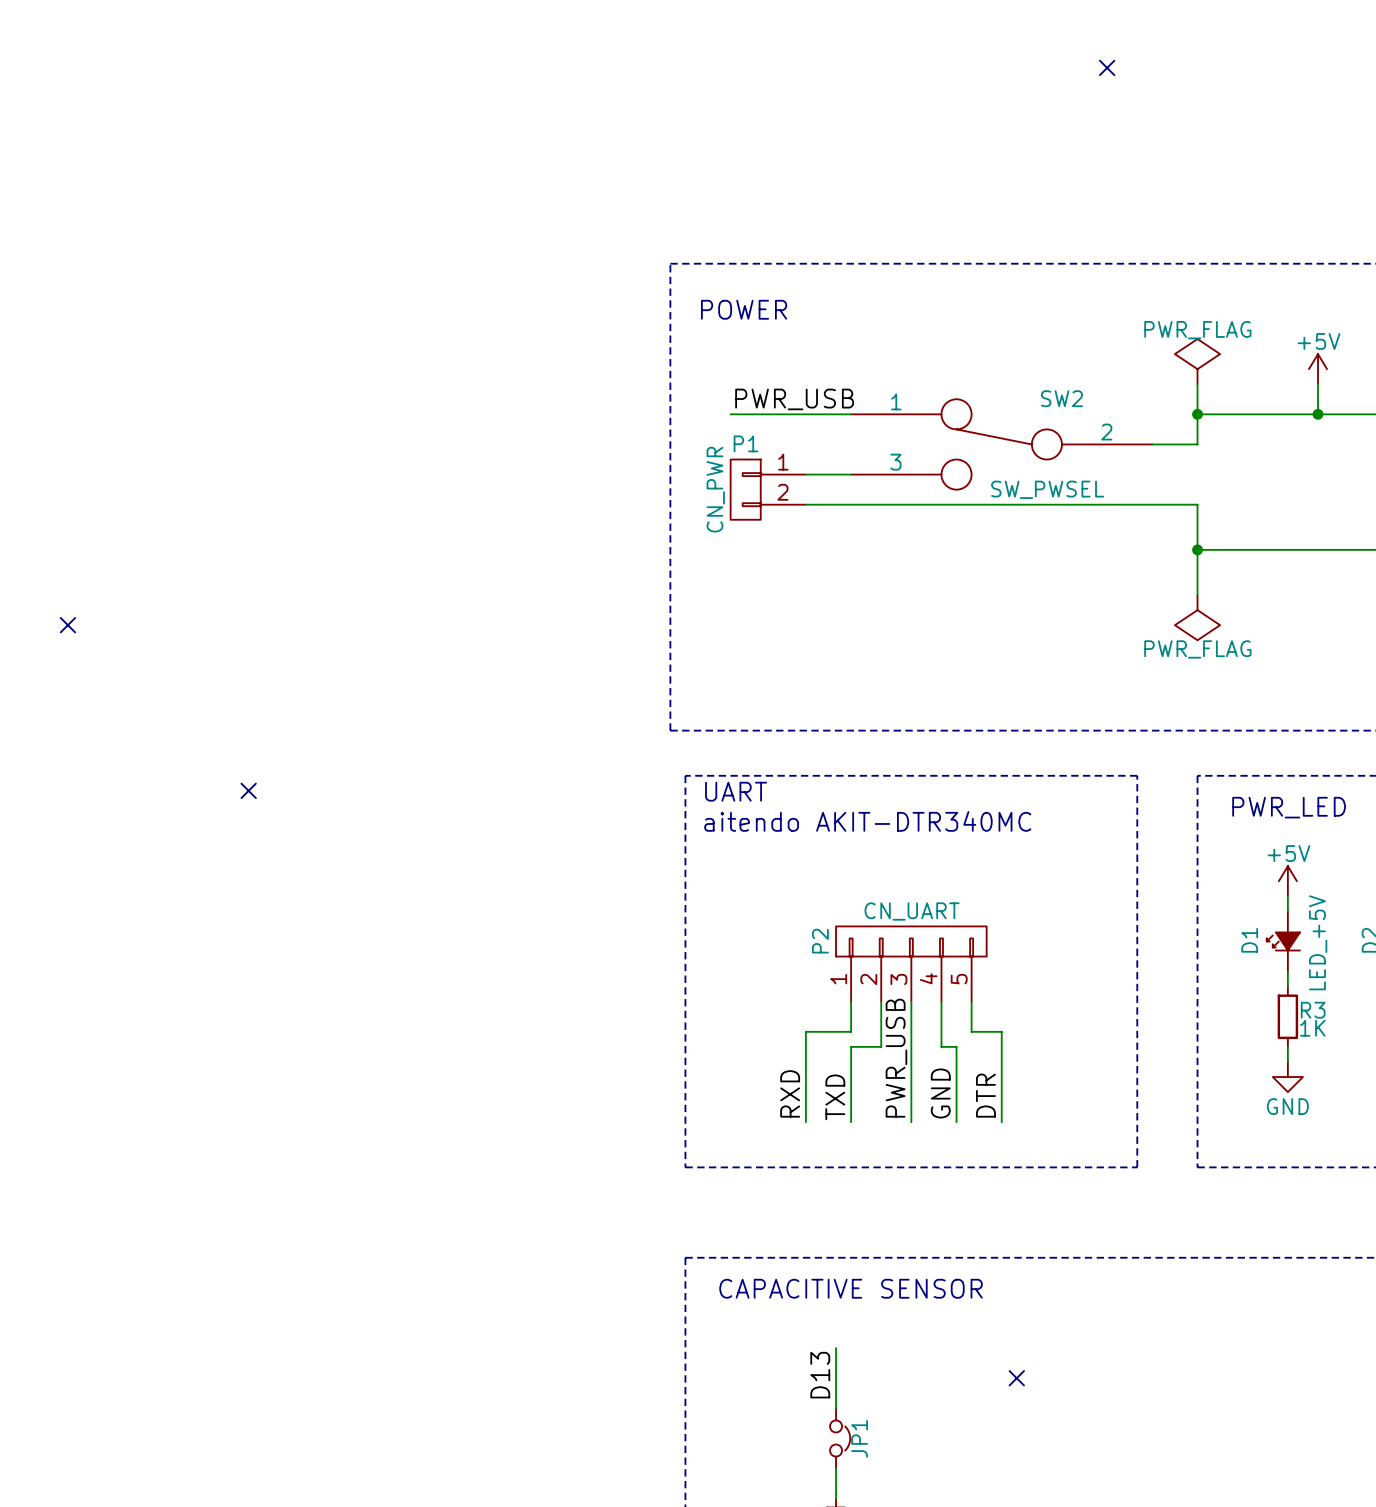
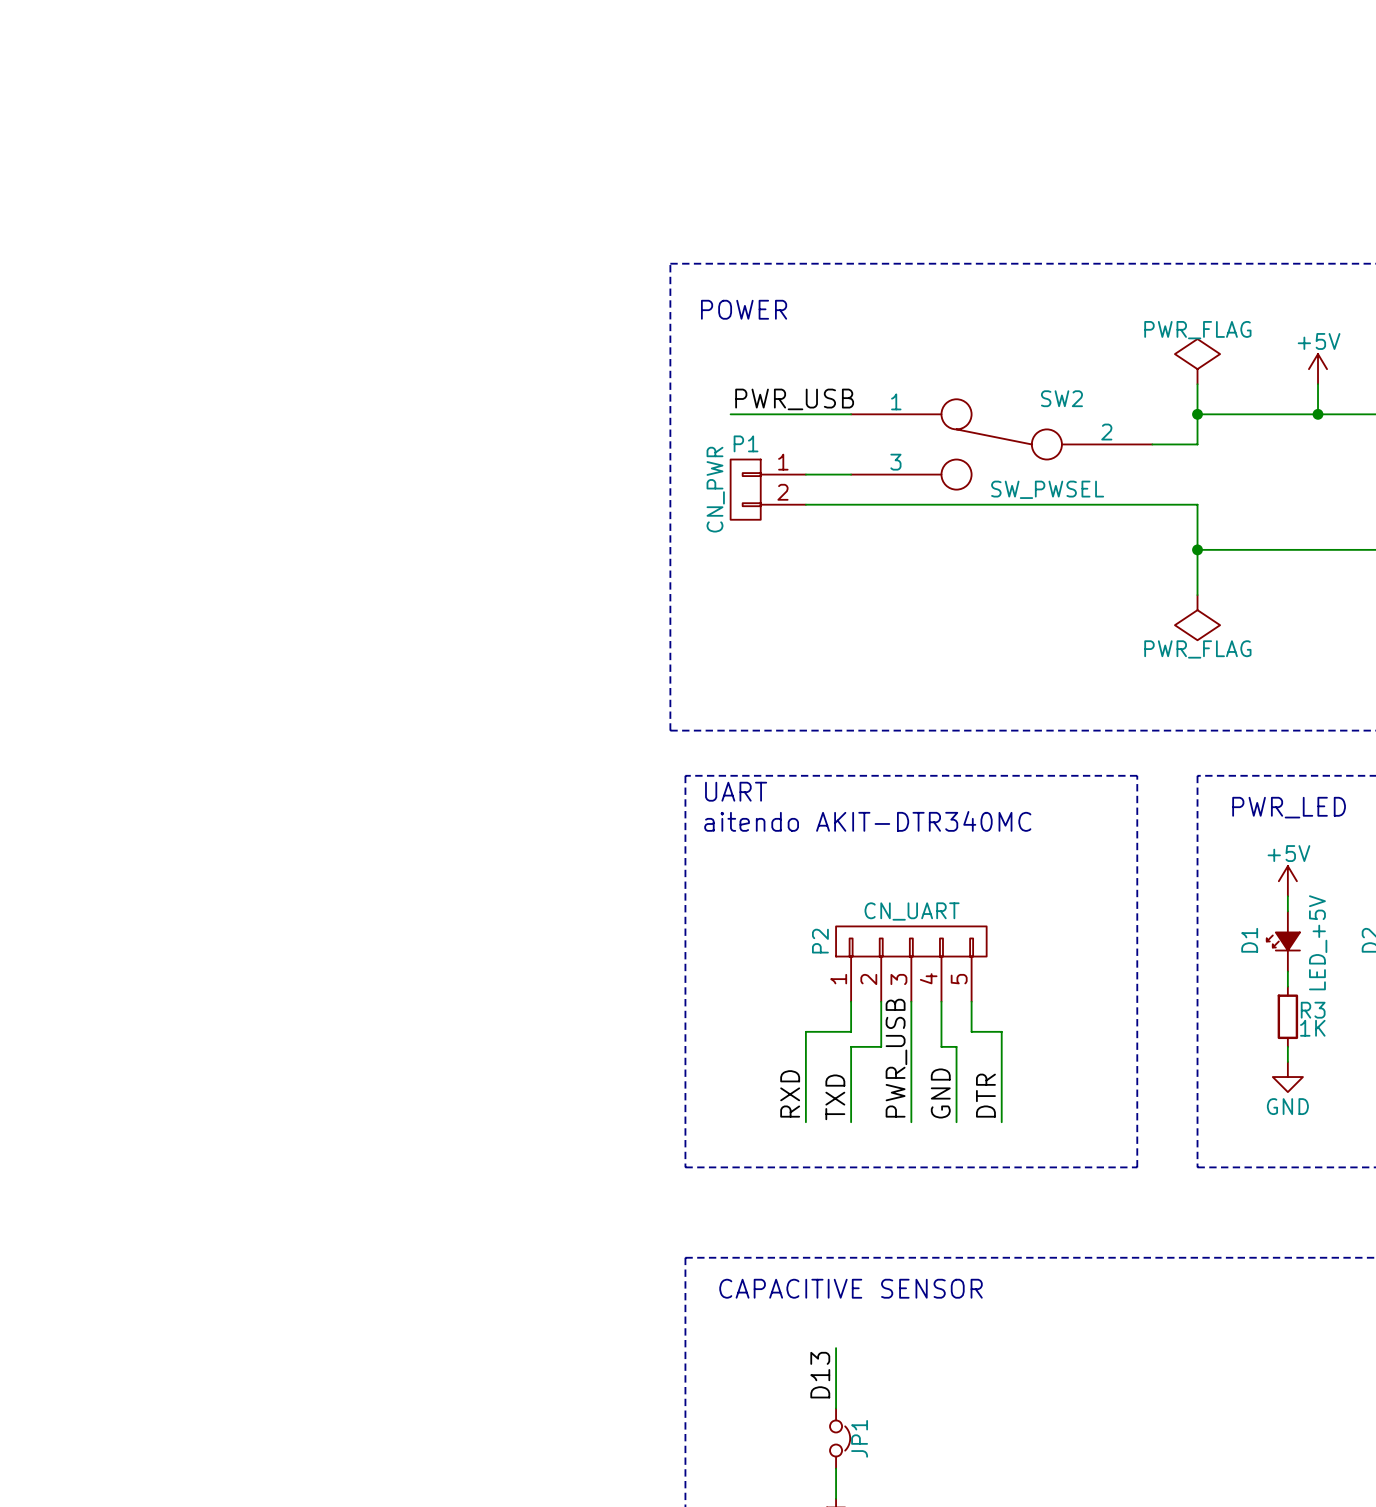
no-connect mark: (1107, 67) -> none
no-connect mark: (67, 625) -> none
no-connect mark: (248, 790) -> none
no-connect mark: (1016, 1378) -> none

